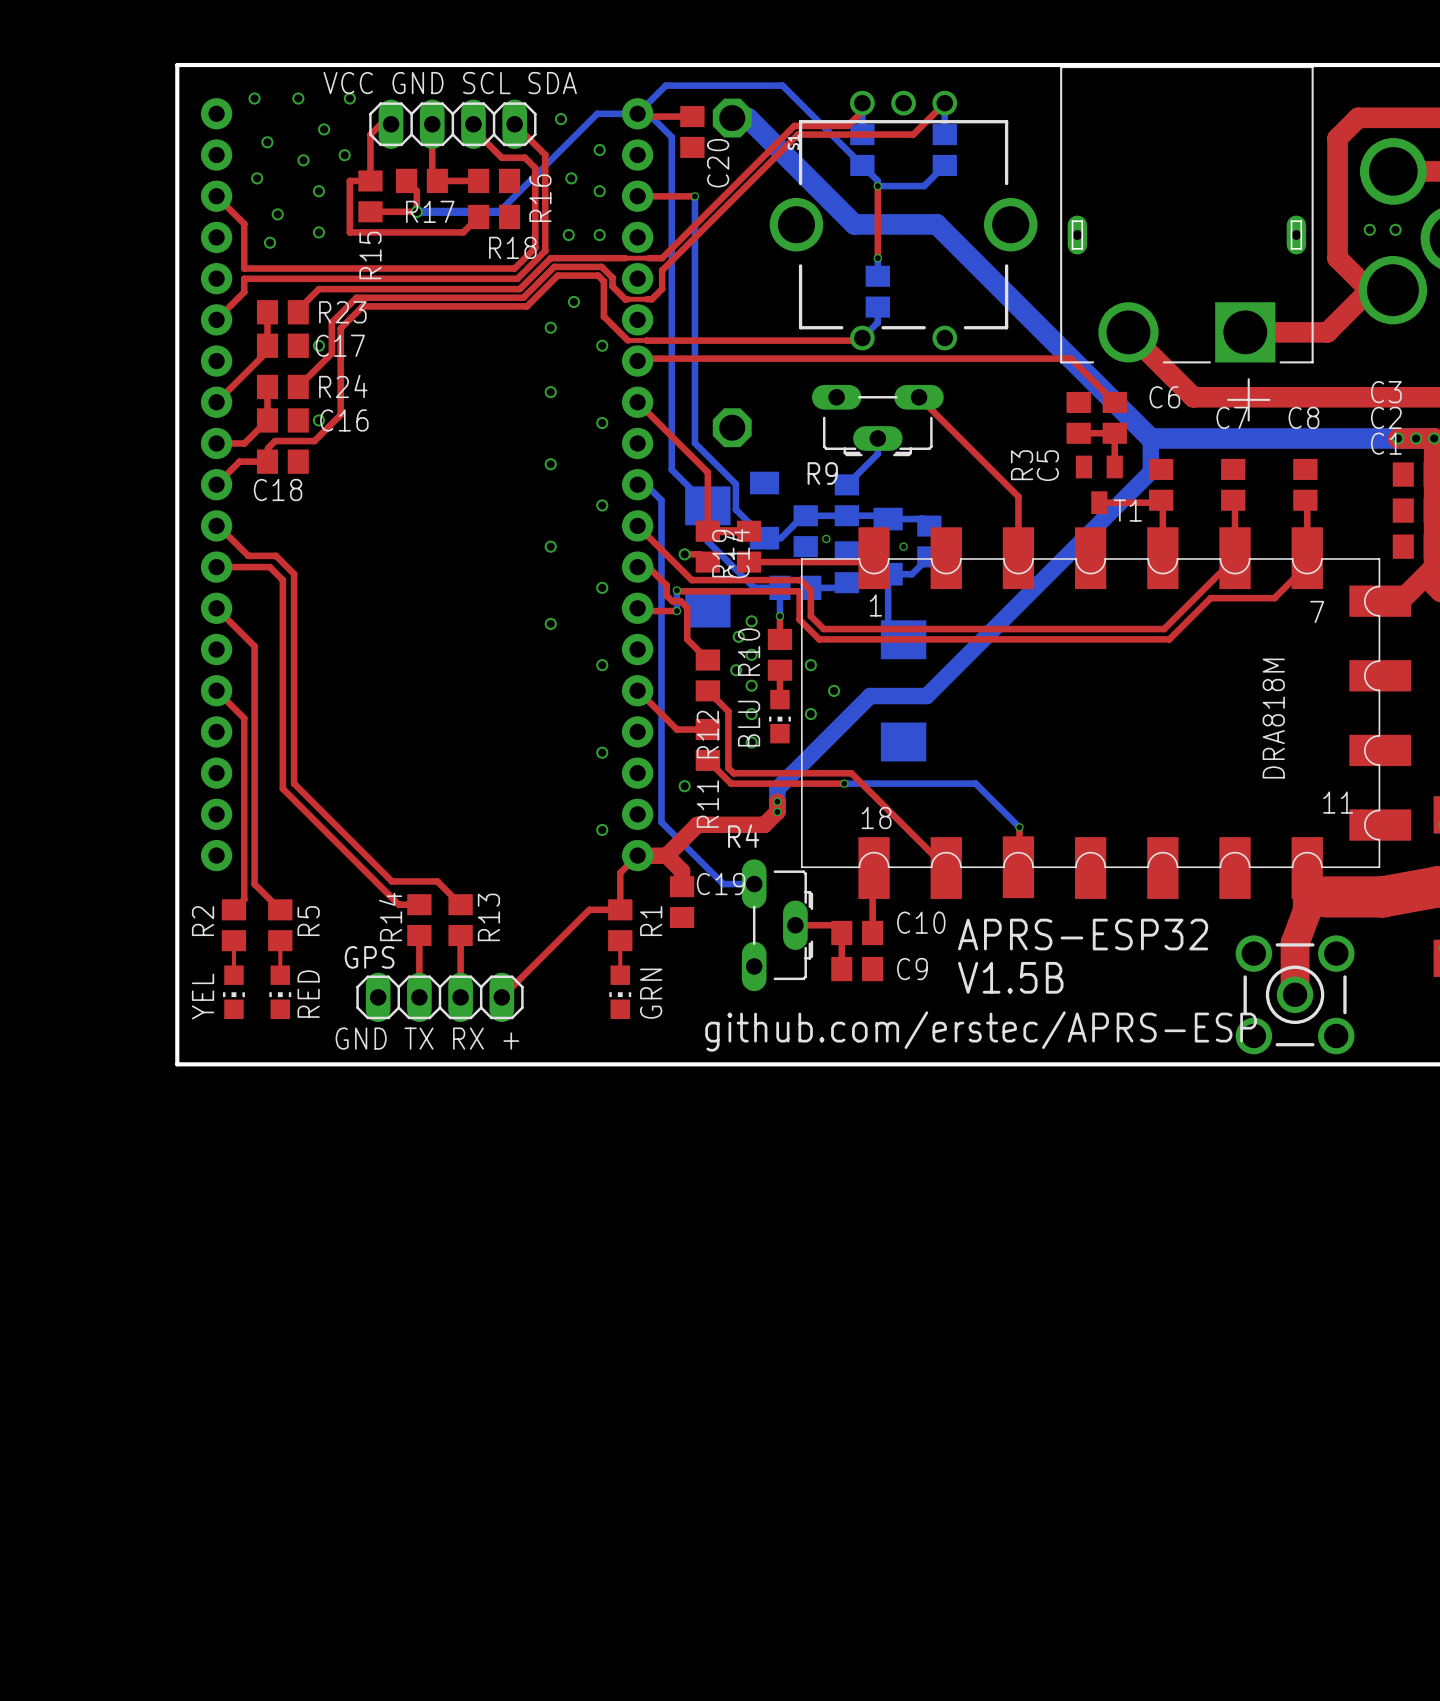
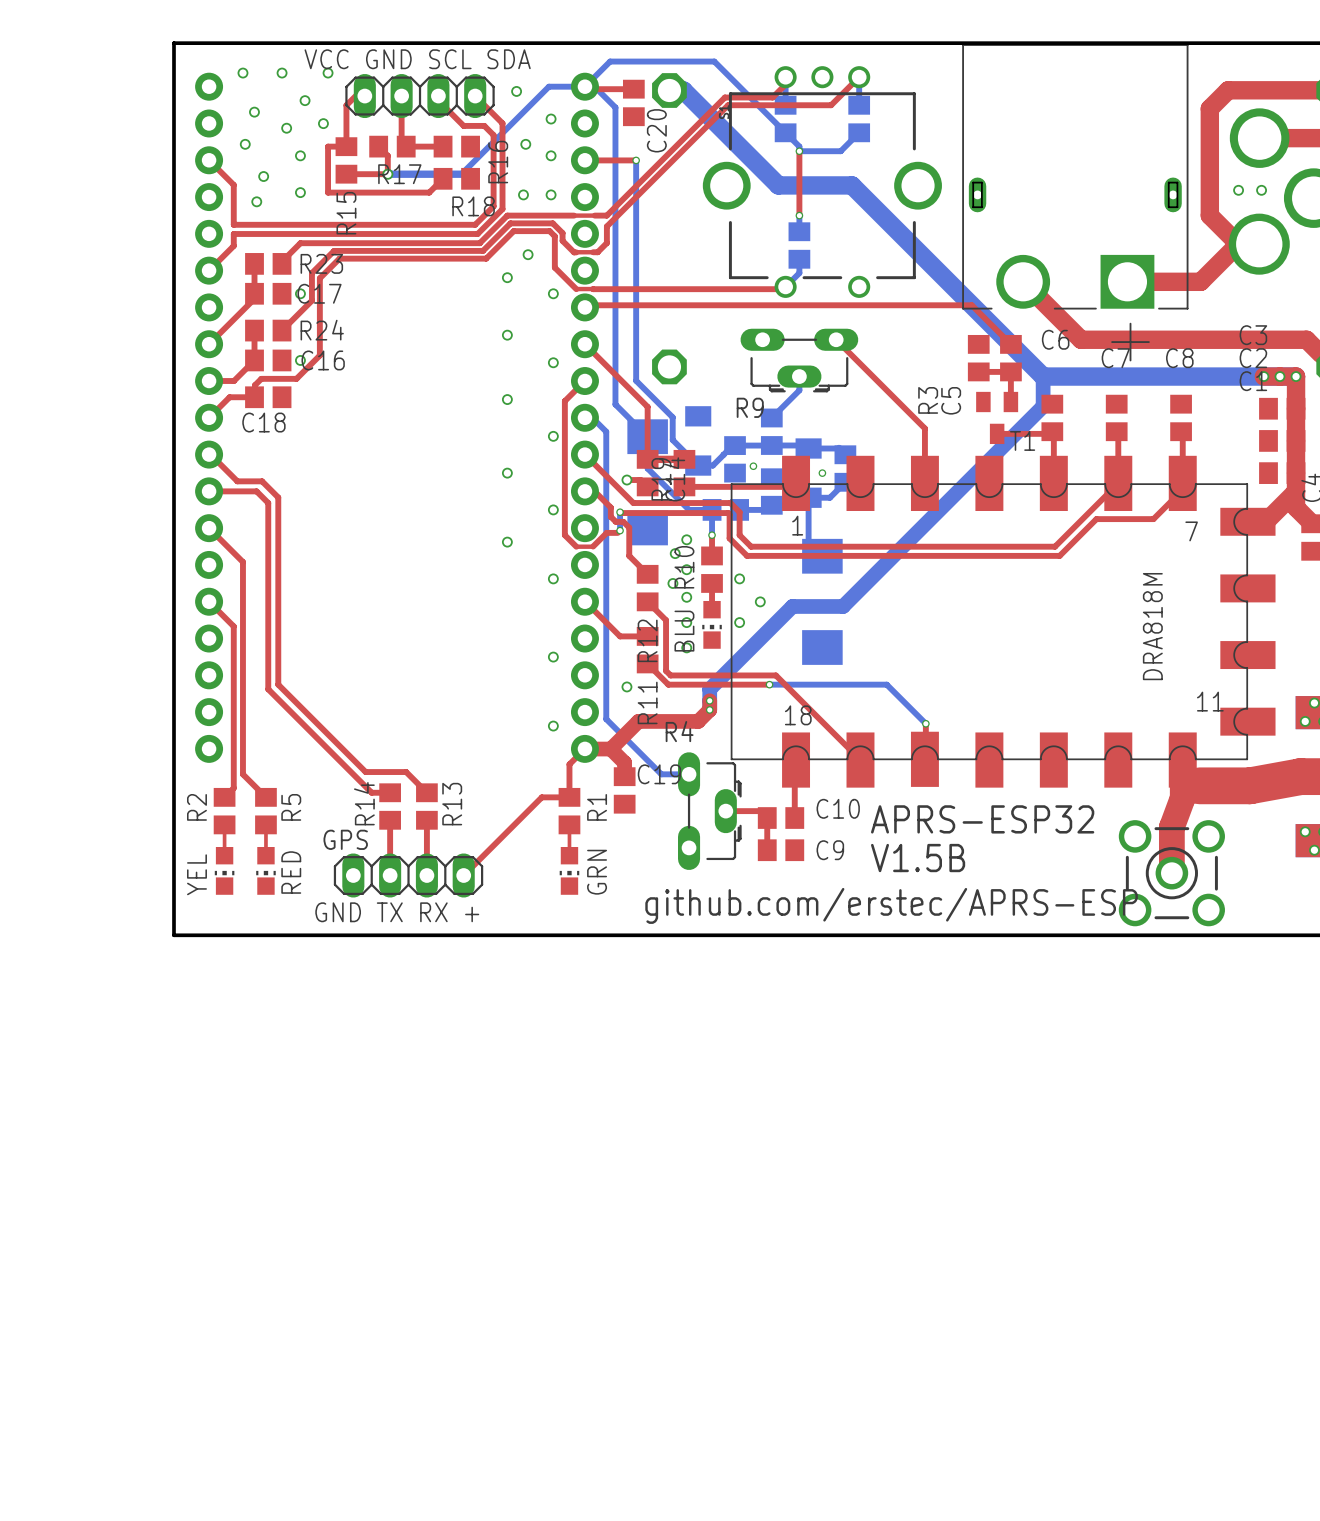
top track: none -> (584, 381) (564, 401) (564, 535) (576, 546) (592, 546)
top track: (637, 608) (640, 611) (676, 611) -> none
top track: none -> (617, 532) (606, 532) (593, 546)

